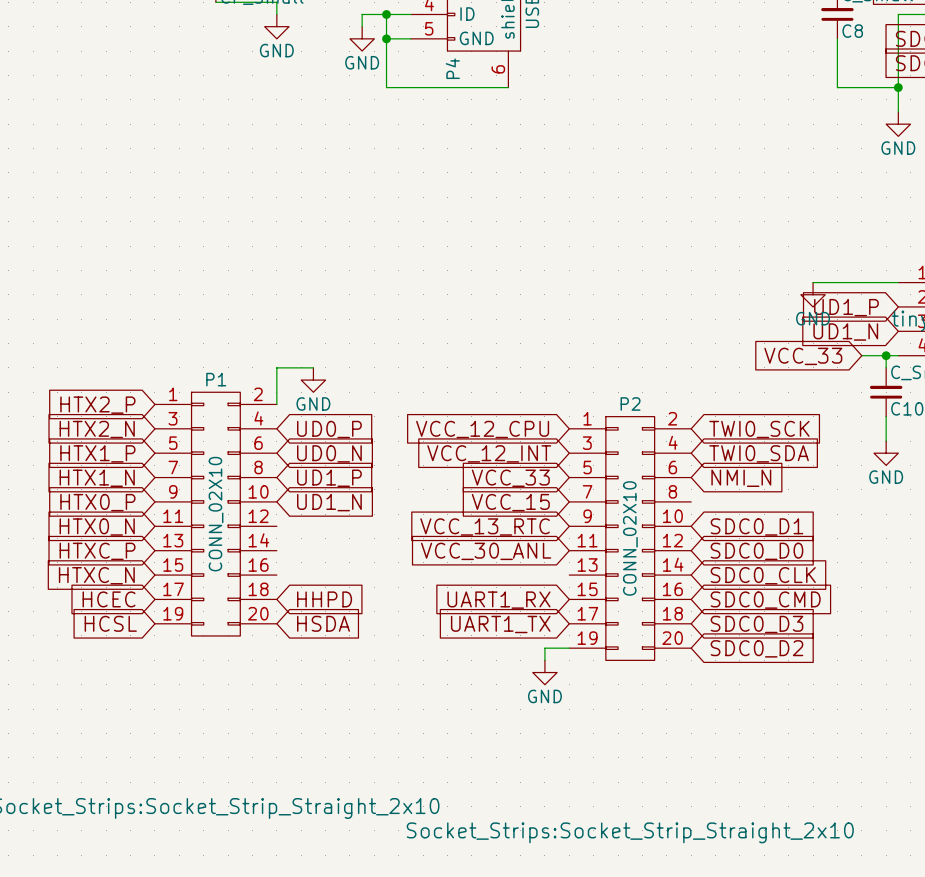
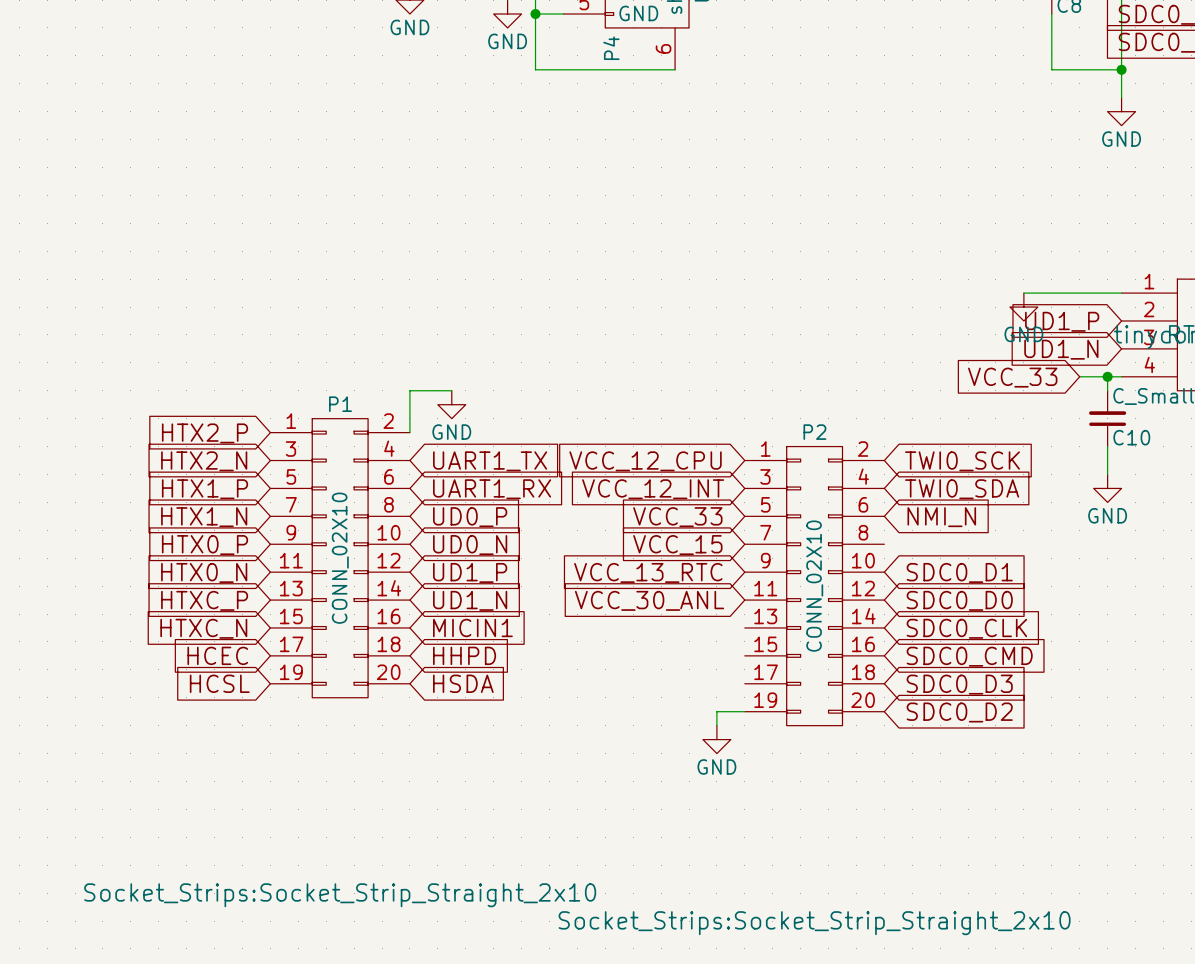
global label: UD0_P (329, 429) -> UART1_TX (490, 461)
global label: UD0_N (329, 453) -> UART1_RX (492, 489)
global label: UD1_P (329, 478) -> UD0_P (470, 517)
global label: UD1_N (329, 502) -> UD0_N (470, 545)
global label: none -> UD1_P (470, 572)
global label: none -> UD1_N (470, 600)
global label: none -> MICIN1 (472, 627)
global label: UART1_RX (498, 600) -> none
global label: UART1_TX (500, 624) -> none

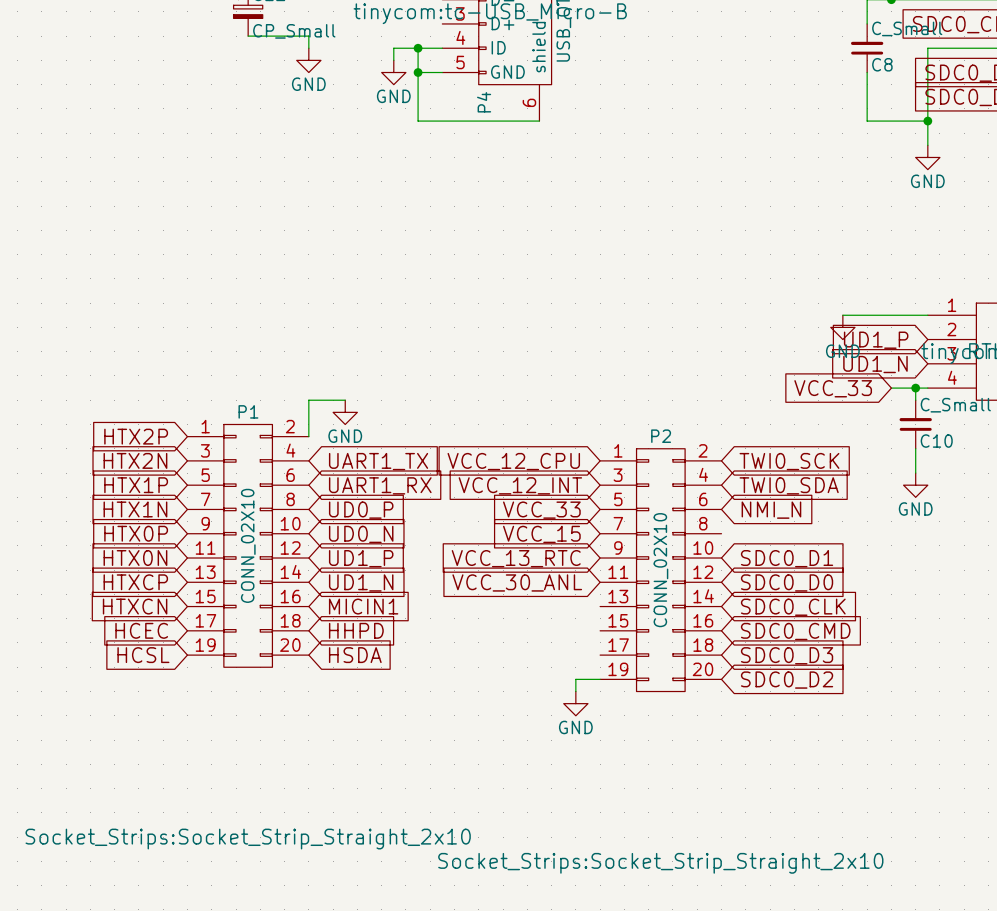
global label: HTX2_P (205, 433) -> HTX2P (136, 436)
global label: HTX2_N (204, 461) -> HTX2N (135, 460)
global label: HTX1_P (205, 489) -> HTX1P (136, 485)
global label: HTX1_N (204, 517) -> HTX1N (135, 509)
global label: HTX0_P (205, 545) -> HTX0P (136, 533)
global label: HTX0_N (204, 572) -> HTX0N (135, 558)
global label: HTXC_P (204, 600) -> HTXCP (135, 582)
global label: HTXC_N (203, 628) -> HTXCN (135, 606)

